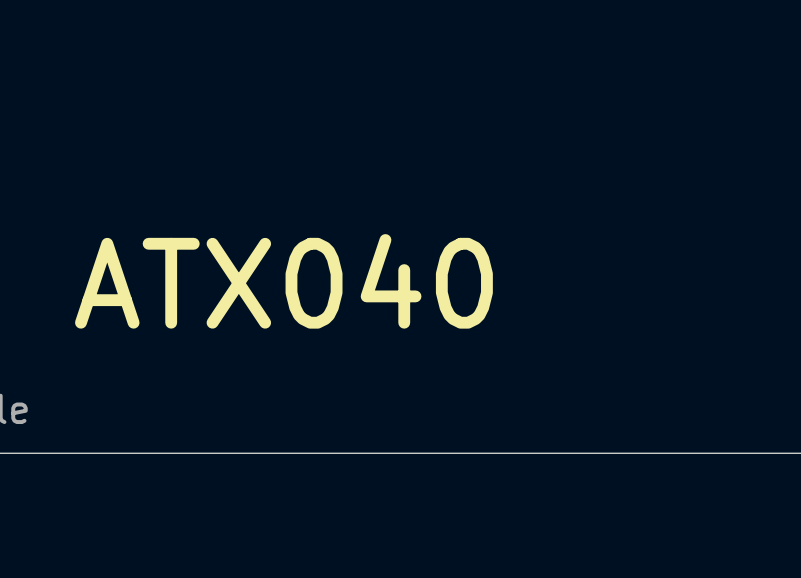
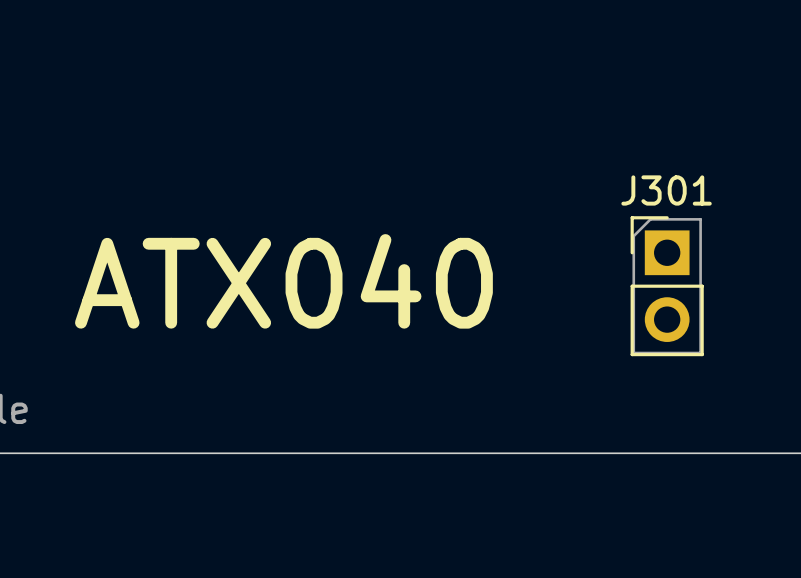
J301: none -> (667, 286)

